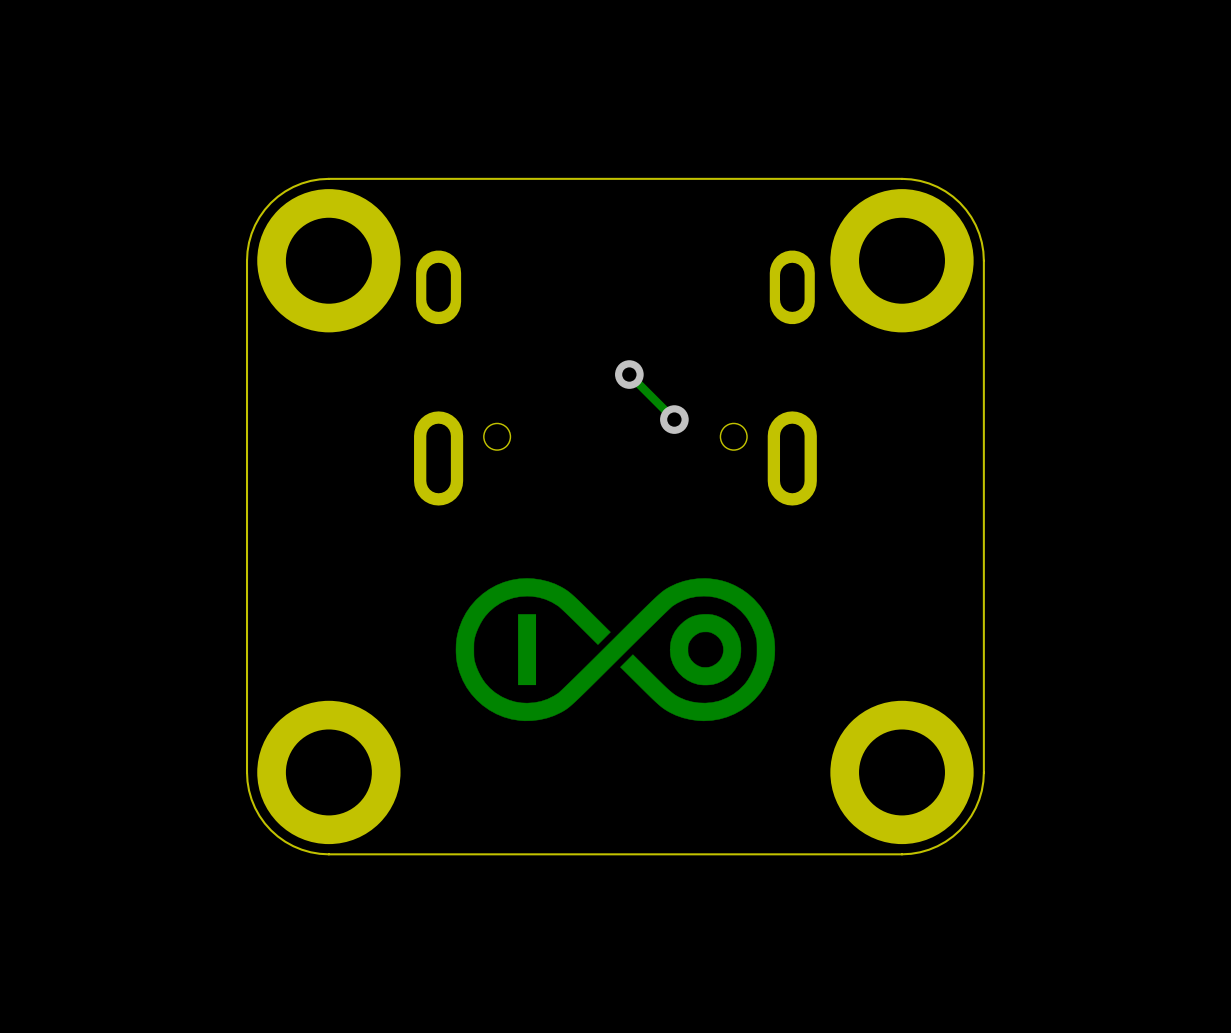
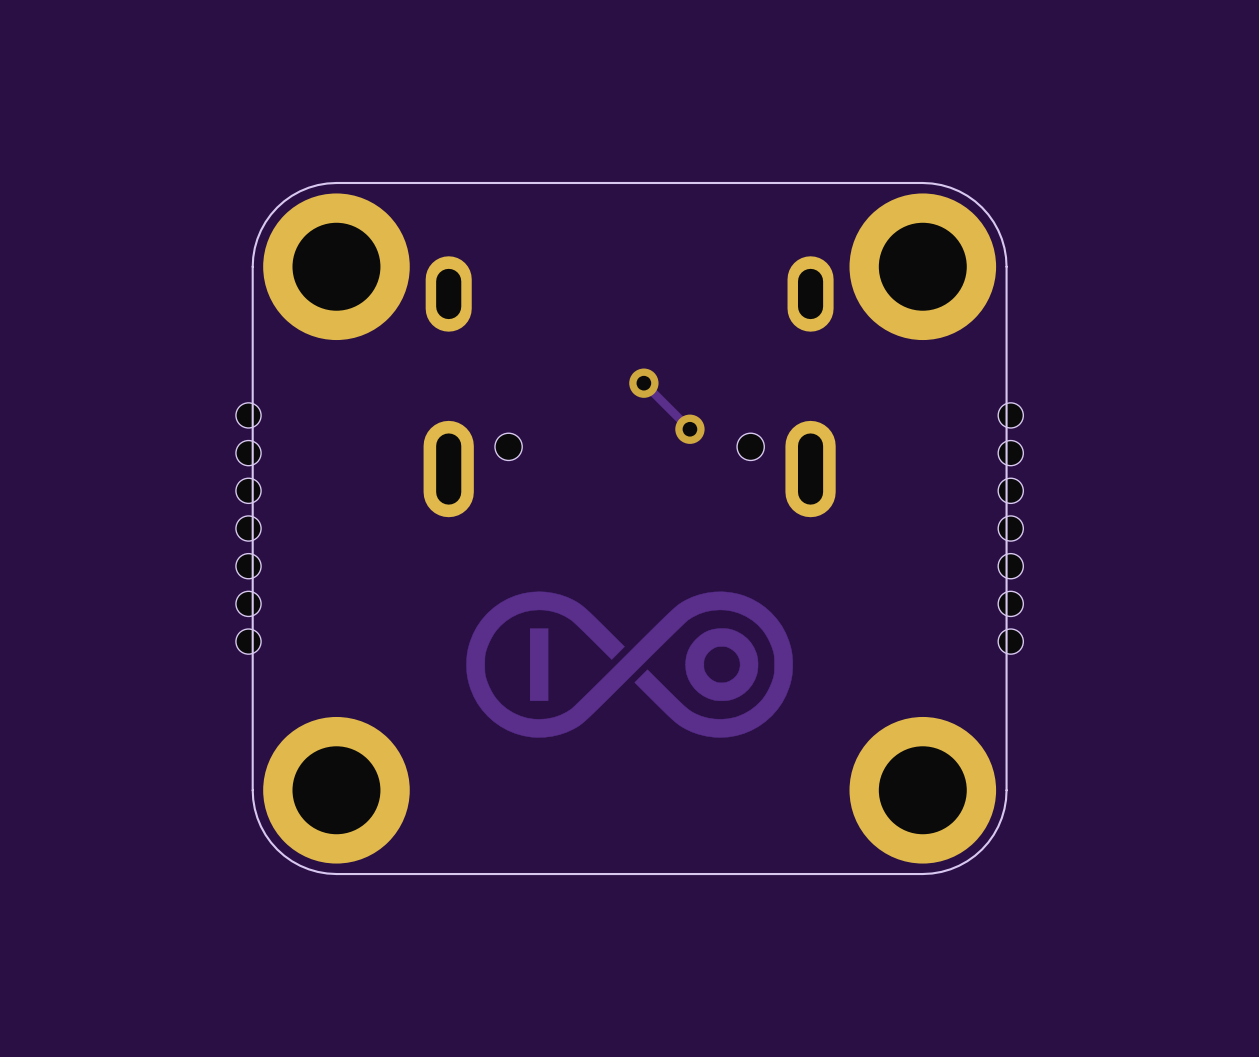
part: none -> (248, 528)
part: none -> (1010, 528)

